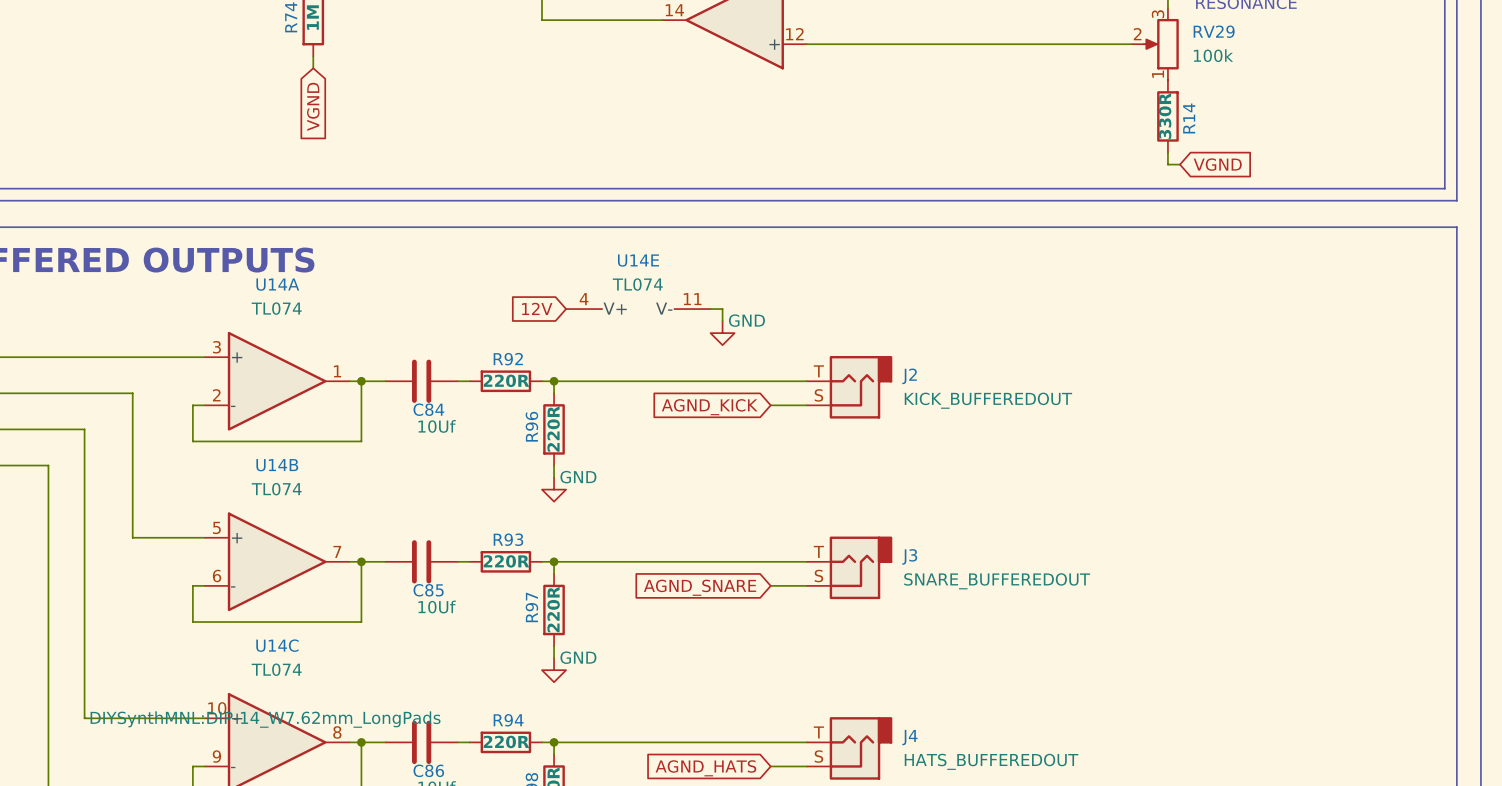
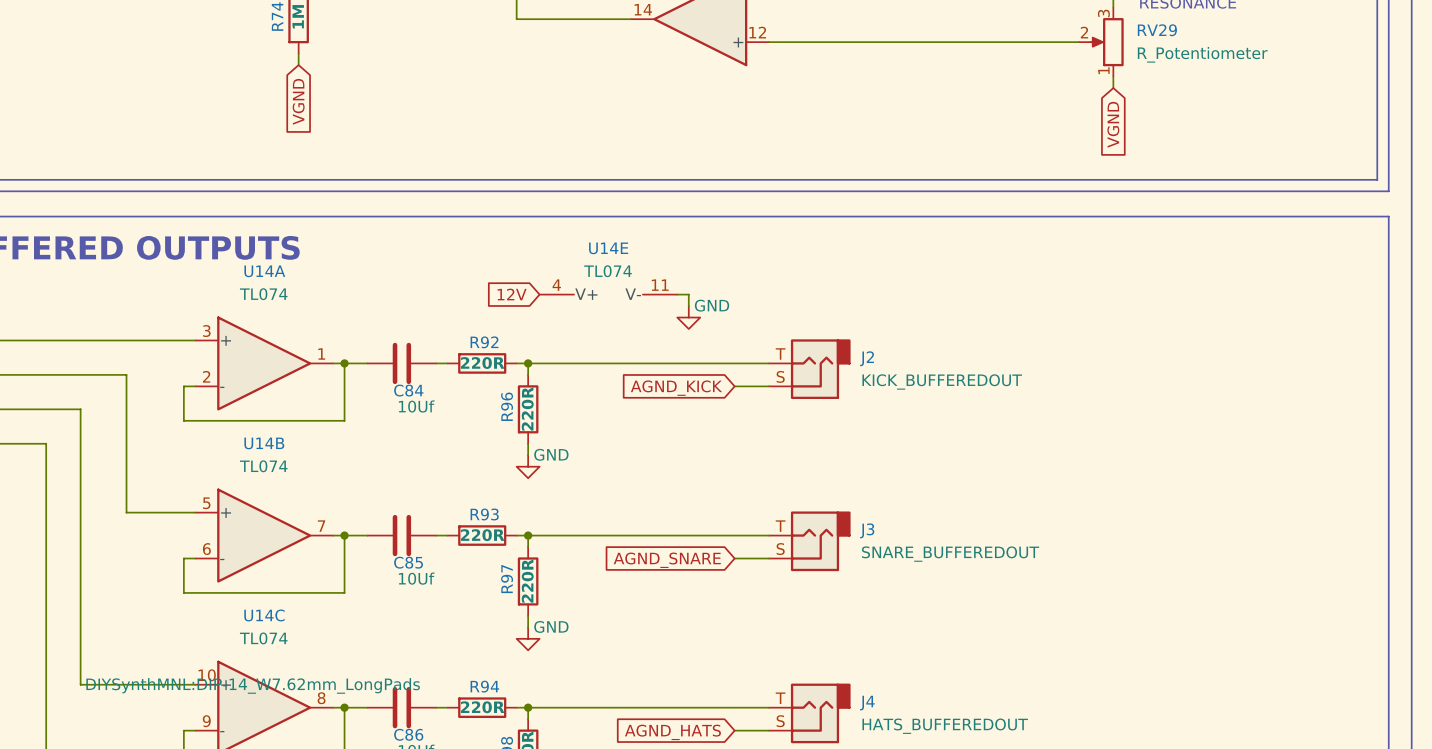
RV29 value: 100k (1213, 55) -> R_Potentiometer (1202, 54)
R14: 330R (1167, 116) -> none
wire: (1167, 152) (1167, 164) (1180, 164) -> none
global label rotation: 0° (1217, 164) -> 90° clockwise (1113, 124)

